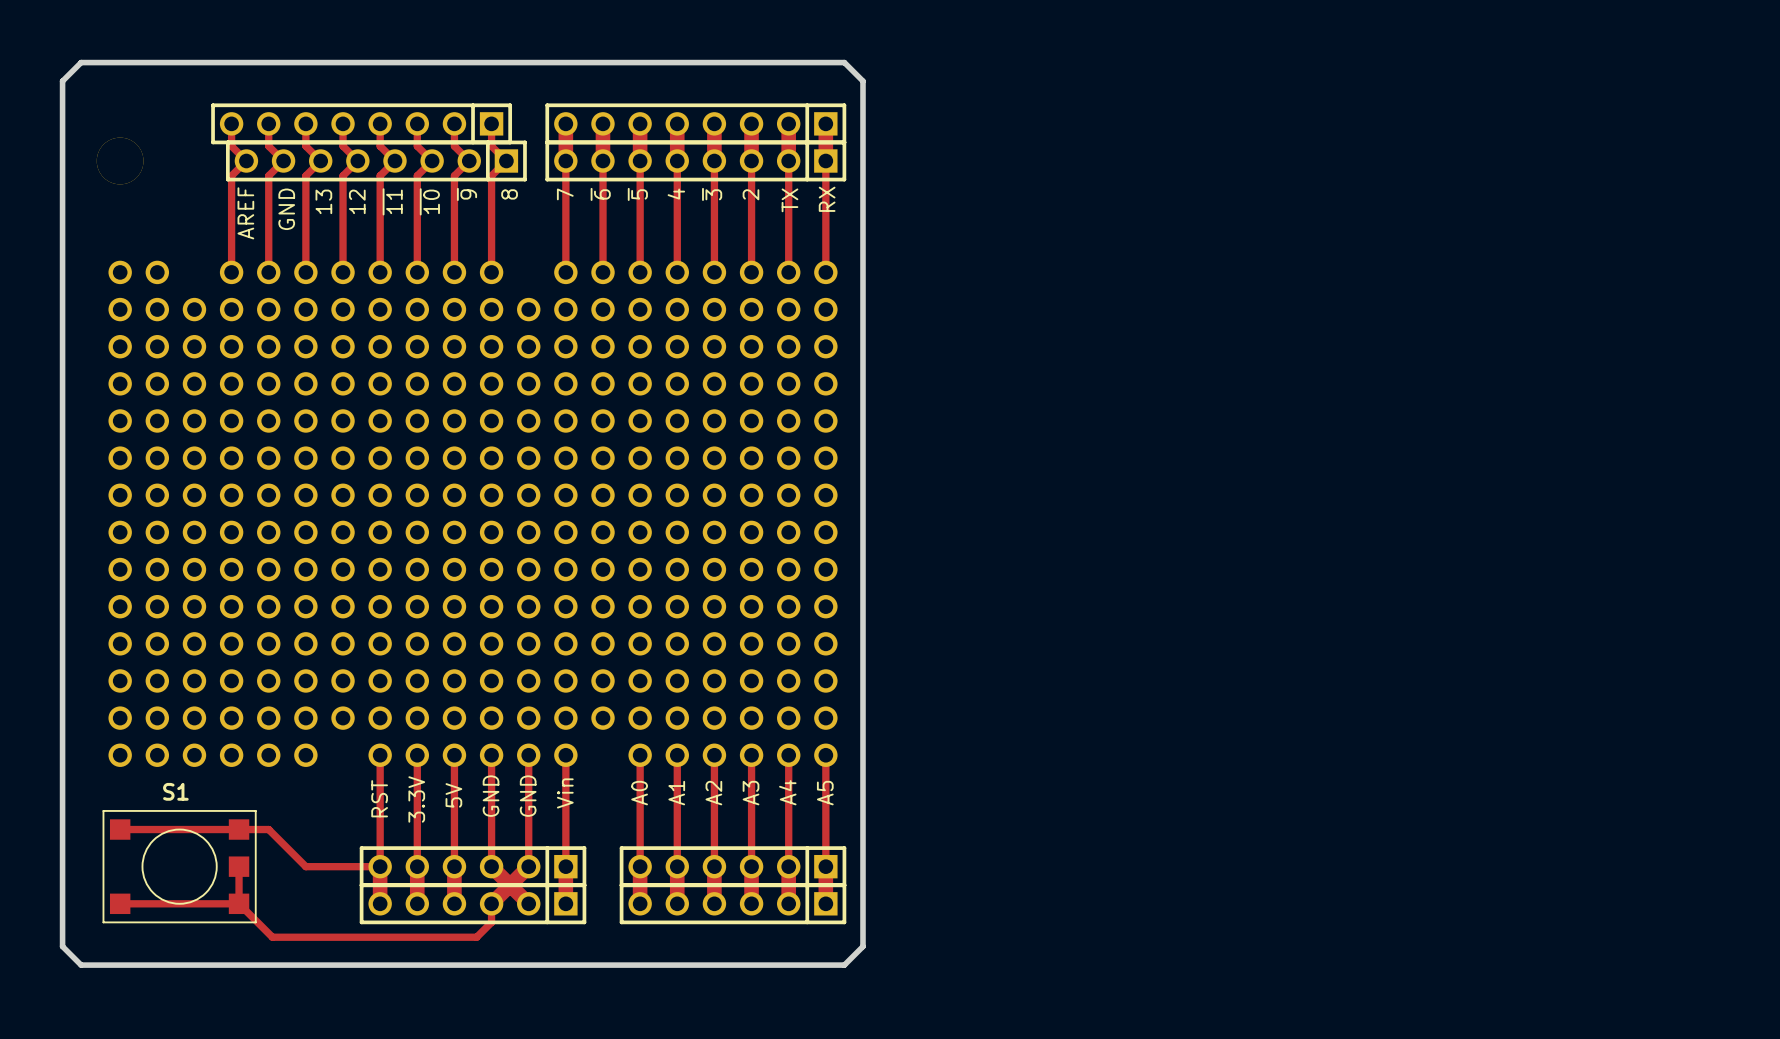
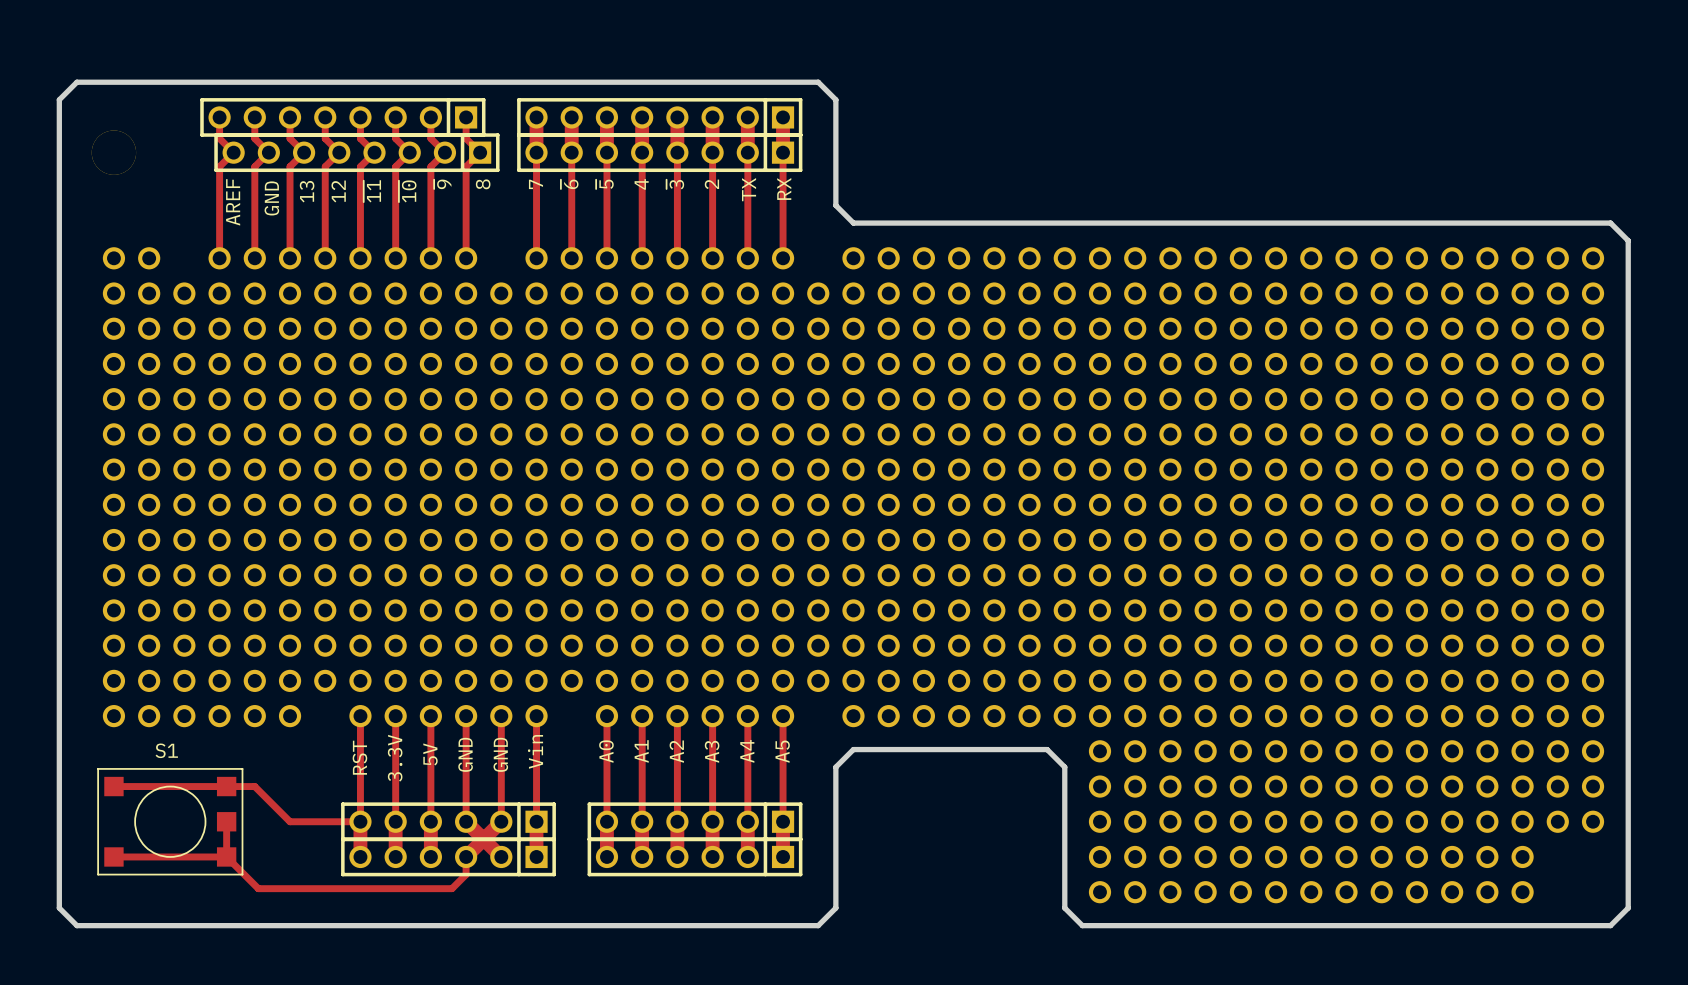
board edge: (62, 105) (62, 81) (81, 62) (844, 62) (862, 81) (862, 946) (844, 965) (81, 965) (62, 946) -> (59, 99) (76, 82) (818, 82) (835, 99) (835, 205) (853, 223) (1610, 223) (1628, 240) (1628, 908) (1610, 925) (1082, 925) (1064, 908) (1064, 767) (1047, 749) (853, 749) (835, 767) (835, 908) (818, 925) (76, 925) (59, 908) (59, 897)
part: none -> (853, 258)
part: none -> (888, 258)
part: none -> (923, 258)
part: none -> (959, 258)
part: none -> (994, 258)
part: none -> (1029, 258)
part: none -> (1064, 258)
part: none -> (1099, 258)
part: none -> (1135, 258)
part: none -> (1170, 258)
part: none -> (1205, 258)
part: none -> (1240, 258)
part: none -> (1276, 258)
part: none -> (1311, 258)
part: none -> (1346, 258)
part: none -> (1381, 258)
part: none -> (1416, 258)
part: none -> (1452, 258)
part: none -> (1487, 258)
part: none -> (1522, 258)
part: none -> (1557, 258)
part: none -> (1593, 258)
part: none -> (818, 293)
part: none -> (853, 293)
part: none -> (888, 293)
part: none -> (923, 293)
part: none -> (959, 293)
part: none -> (994, 293)
part: none -> (1029, 293)
part: none -> (1064, 293)
part: none -> (1099, 293)
part: none -> (1135, 293)
part: none -> (1170, 293)
part: none -> (1205, 293)
part: none -> (1240, 293)
part: none -> (1276, 293)
part: none -> (1311, 293)
part: none -> (1346, 293)
part: none -> (1381, 293)
part: none -> (1416, 293)
part: none -> (1452, 293)
part: none -> (1487, 293)
part: none -> (1522, 293)
part: none -> (1557, 293)
part: none -> (1593, 293)
part: none -> (818, 328)
part: none -> (853, 328)
part: none -> (888, 328)
part: none -> (923, 328)
part: none -> (959, 328)
part: none -> (994, 328)
part: none -> (1029, 328)
part: none -> (1064, 328)
part: none -> (1099, 328)
part: none -> (1135, 328)
part: none -> (1170, 328)
part: none -> (1205, 328)
part: none -> (1240, 328)
part: none -> (1276, 328)
part: none -> (1311, 328)
part: none -> (1346, 328)
part: none -> (1381, 328)
part: none -> (1416, 328)
part: none -> (1452, 328)
part: none -> (1487, 328)
part: none -> (1522, 328)
part: none -> (1557, 328)
part: none -> (1593, 328)
part: none -> (818, 363)
part: none -> (853, 363)
part: none -> (888, 363)
part: none -> (923, 363)
part: none -> (959, 363)
part: none -> (994, 363)
part: none -> (1029, 363)
part: none -> (1064, 363)
part: none -> (1099, 363)
part: none -> (1135, 363)
part: none -> (1170, 363)
part: none -> (1205, 363)
part: none -> (1240, 363)
part: none -> (1276, 363)
part: none -> (1311, 363)
part: none -> (1346, 363)
part: none -> (1381, 363)
part: none -> (1416, 363)
part: none -> (1452, 363)
part: none -> (1487, 363)
part: none -> (1522, 363)
part: none -> (1557, 363)
part: none -> (1593, 363)
part: none -> (818, 399)
part: none -> (853, 399)
part: none -> (888, 399)
part: none -> (923, 399)
part: none -> (959, 399)
part: none -> (994, 399)
part: none -> (1029, 399)
part: none -> (1064, 399)
part: none -> (1099, 399)
part: none -> (1135, 399)
part: none -> (1170, 399)
part: none -> (1205, 399)
part: none -> (1240, 399)
part: none -> (1276, 399)
part: none -> (1311, 399)
part: none -> (1346, 399)
part: none -> (1381, 399)
part: none -> (1416, 399)
part: none -> (1452, 399)
part: none -> (1487, 399)
part: none -> (1522, 399)
part: none -> (1557, 399)
part: none -> (1593, 399)
part: none -> (818, 434)
part: none -> (853, 434)
part: none -> (888, 434)
part: none -> (923, 434)
part: none -> (959, 434)
part: none -> (994, 434)
part: none -> (1029, 434)
part: none -> (1064, 434)
part: none -> (1099, 434)
part: none -> (1135, 434)
part: none -> (1170, 434)
part: none -> (1205, 434)
part: none -> (1240, 434)
part: none -> (1276, 434)
part: none -> (1311, 434)
part: none -> (1346, 434)
part: none -> (1381, 434)
part: none -> (1416, 434)
part: none -> (1452, 434)
part: none -> (1487, 434)
part: none -> (1522, 434)
part: none -> (1557, 434)
part: none -> (1593, 434)
part: none -> (818, 469)
part: none -> (853, 469)
part: none -> (888, 469)
part: none -> (923, 469)
part: none -> (959, 469)
part: none -> (994, 469)
part: none -> (1029, 469)
part: none -> (1064, 469)
part: none -> (1099, 469)
part: none -> (1135, 469)
part: none -> (1170, 469)
part: none -> (1205, 469)
part: none -> (1240, 469)
part: none -> (1276, 469)
part: none -> (1311, 469)
part: none -> (1346, 469)
part: none -> (1381, 469)
part: none -> (1416, 469)
part: none -> (1452, 469)
part: none -> (1487, 469)
part: none -> (1522, 469)
part: none -> (1557, 469)
part: none -> (1593, 469)
part: none -> (818, 504)
part: none -> (853, 504)
part: none -> (888, 504)
part: none -> (923, 504)
part: none -> (959, 504)
part: none -> (994, 504)
part: none -> (1029, 504)
part: none -> (1064, 504)
part: none -> (1099, 504)
part: none -> (1135, 504)
part: none -> (1170, 504)
part: none -> (1205, 504)
part: none -> (1240, 504)
part: none -> (1276, 504)
part: none -> (1311, 504)
part: none -> (1346, 504)
part: none -> (1381, 504)
part: none -> (1416, 504)
part: none -> (1452, 504)
part: none -> (1487, 504)
part: none -> (1522, 504)
part: none -> (1557, 504)
part: none -> (1593, 504)
part: none -> (818, 540)
part: none -> (853, 540)
part: none -> (888, 540)
part: none -> (923, 540)
part: none -> (959, 540)
part: none -> (994, 540)
part: none -> (1029, 540)
part: none -> (1064, 540)
part: none -> (1099, 540)
part: none -> (1135, 540)
part: none -> (1170, 540)
part: none -> (1205, 540)
part: none -> (1240, 540)
part: none -> (1276, 540)
part: none -> (1311, 540)
part: none -> (1346, 540)
part: none -> (1381, 540)
part: none -> (1416, 540)
part: none -> (1452, 540)
part: none -> (1487, 540)
part: none -> (1522, 540)
part: none -> (1557, 540)
part: none -> (1593, 540)
part: none -> (818, 575)
part: none -> (853, 575)
part: none -> (888, 575)
part: none -> (923, 575)
part: none -> (959, 575)
part: none -> (994, 575)
part: none -> (1029, 575)
part: none -> (1064, 575)
part: none -> (1099, 575)
part: none -> (1135, 575)
part: none -> (1170, 575)
part: none -> (1205, 575)
part: none -> (1240, 575)
part: none -> (1276, 575)
part: none -> (1311, 575)
part: none -> (1346, 575)
part: none -> (1381, 575)
part: none -> (1416, 575)
part: none -> (1452, 575)
part: none -> (1487, 575)
part: none -> (1522, 575)
part: none -> (1557, 575)
part: none -> (1593, 575)
part: none -> (818, 610)
part: none -> (853, 610)
part: none -> (888, 610)
part: none -> (923, 610)
part: none -> (959, 610)
part: none -> (994, 610)
part: none -> (1029, 610)
part: none -> (1064, 610)
part: none -> (1099, 610)
part: none -> (1135, 610)
part: none -> (1170, 610)
part: none -> (1205, 610)
part: none -> (1240, 610)
part: none -> (1276, 610)
part: none -> (1311, 610)
part: none -> (1346, 610)
part: none -> (1381, 610)
part: none -> (1416, 610)
part: none -> (1452, 610)
part: none -> (1487, 610)
part: none -> (1522, 610)
part: none -> (1557, 610)
part: none -> (1593, 610)
part: none -> (818, 645)
part: none -> (853, 645)
part: none -> (888, 645)
part: none -> (923, 645)
part: none -> (959, 645)
part: none -> (994, 645)
part: none -> (1029, 645)
part: none -> (1064, 645)
part: none -> (1099, 645)
part: none -> (1135, 645)
part: none -> (1170, 645)
part: none -> (1205, 645)
part: none -> (1240, 645)
part: none -> (1276, 645)
part: none -> (1311, 645)
part: none -> (1346, 645)
part: none -> (1381, 645)
part: none -> (1416, 645)
part: none -> (1452, 645)
part: none -> (1487, 645)
part: none -> (1522, 645)
part: none -> (1557, 645)
part: none -> (1593, 645)
part: none -> (818, 680)
part: none -> (853, 680)
part: none -> (888, 680)
part: none -> (923, 680)
part: none -> (959, 680)
part: none -> (994, 680)
part: none -> (1029, 680)
part: none -> (1064, 680)
part: none -> (1099, 680)
part: none -> (1135, 680)
part: none -> (1170, 680)
part: none -> (1205, 680)
part: none -> (1240, 680)
part: none -> (1276, 680)
part: none -> (1311, 680)
part: none -> (1346, 680)
part: none -> (1381, 680)
part: none -> (1416, 680)
part: none -> (1452, 680)
part: none -> (1487, 680)
part: none -> (1522, 680)
part: none -> (1557, 680)
part: none -> (1593, 680)
part: none -> (853, 716)
part: none -> (888, 716)
part: none -> (923, 716)
part: none -> (959, 716)
part: none -> (994, 716)
part: none -> (1029, 716)
part: none -> (1064, 716)
part: none -> (1099, 716)
part: none -> (1135, 716)
part: none -> (1170, 716)
part: none -> (1205, 716)
part: none -> (1240, 716)
part: none -> (1276, 716)
part: none -> (1311, 716)
part: none -> (1346, 716)
part: none -> (1381, 716)
part: none -> (1416, 716)
part: none -> (1452, 716)
part: none -> (1487, 716)
part: none -> (1522, 716)
part: none -> (1557, 716)
part: none -> (1593, 716)
part: none -> (1099, 751)
part: none -> (1135, 751)
part: none -> (1170, 751)
part: none -> (1205, 751)
part: none -> (1240, 751)
part: none -> (1276, 751)
part: none -> (1311, 751)
part: none -> (1346, 751)
part: none -> (1381, 751)
part: none -> (1416, 751)
part: none -> (1452, 751)
part: none -> (1487, 751)
part: none -> (1522, 751)
part: none -> (1557, 751)
part: none -> (1593, 751)
part: none -> (1099, 786)
part: none -> (1135, 786)
part: none -> (1170, 786)
part: none -> (1205, 786)
part: none -> (1240, 786)
part: none -> (1276, 786)
part: none -> (1311, 786)
part: none -> (1346, 786)
part: none -> (1381, 786)
part: none -> (1416, 786)
part: none -> (1452, 786)
part: none -> (1487, 786)
part: none -> (1522, 786)
part: none -> (1557, 786)
part: none -> (1593, 786)
part: none -> (1099, 821)
part: none -> (1135, 821)
part: none -> (1170, 821)
part: none -> (1205, 821)
part: none -> (1240, 821)
part: none -> (1276, 821)
part: none -> (1311, 821)
part: none -> (1346, 821)
part: none -> (1381, 821)
part: none -> (1416, 821)
part: none -> (1452, 821)
part: none -> (1487, 821)
part: none -> (1522, 821)
part: none -> (1557, 821)
part: none -> (1593, 821)
part: none -> (1099, 856)
part: none -> (1135, 856)
part: none -> (1170, 856)
part: none -> (1205, 856)
part: none -> (1240, 856)
part: none -> (1276, 856)
part: none -> (1311, 856)
part: none -> (1346, 856)
part: none -> (1381, 856)
part: none -> (1416, 856)
part: none -> (1452, 856)
part: none -> (1487, 856)
part: none -> (1522, 856)
part: none -> (1099, 892)
part: none -> (1135, 892)
part: none -> (1170, 892)
part: none -> (1205, 892)
part: none -> (1240, 892)
part: none -> (1276, 892)
part: none -> (1311, 892)
part: none -> (1346, 892)
part: none -> (1381, 892)
part: none -> (1416, 892)
part: none -> (1452, 892)
part: none -> (1487, 892)
part: none -> (1522, 892)

